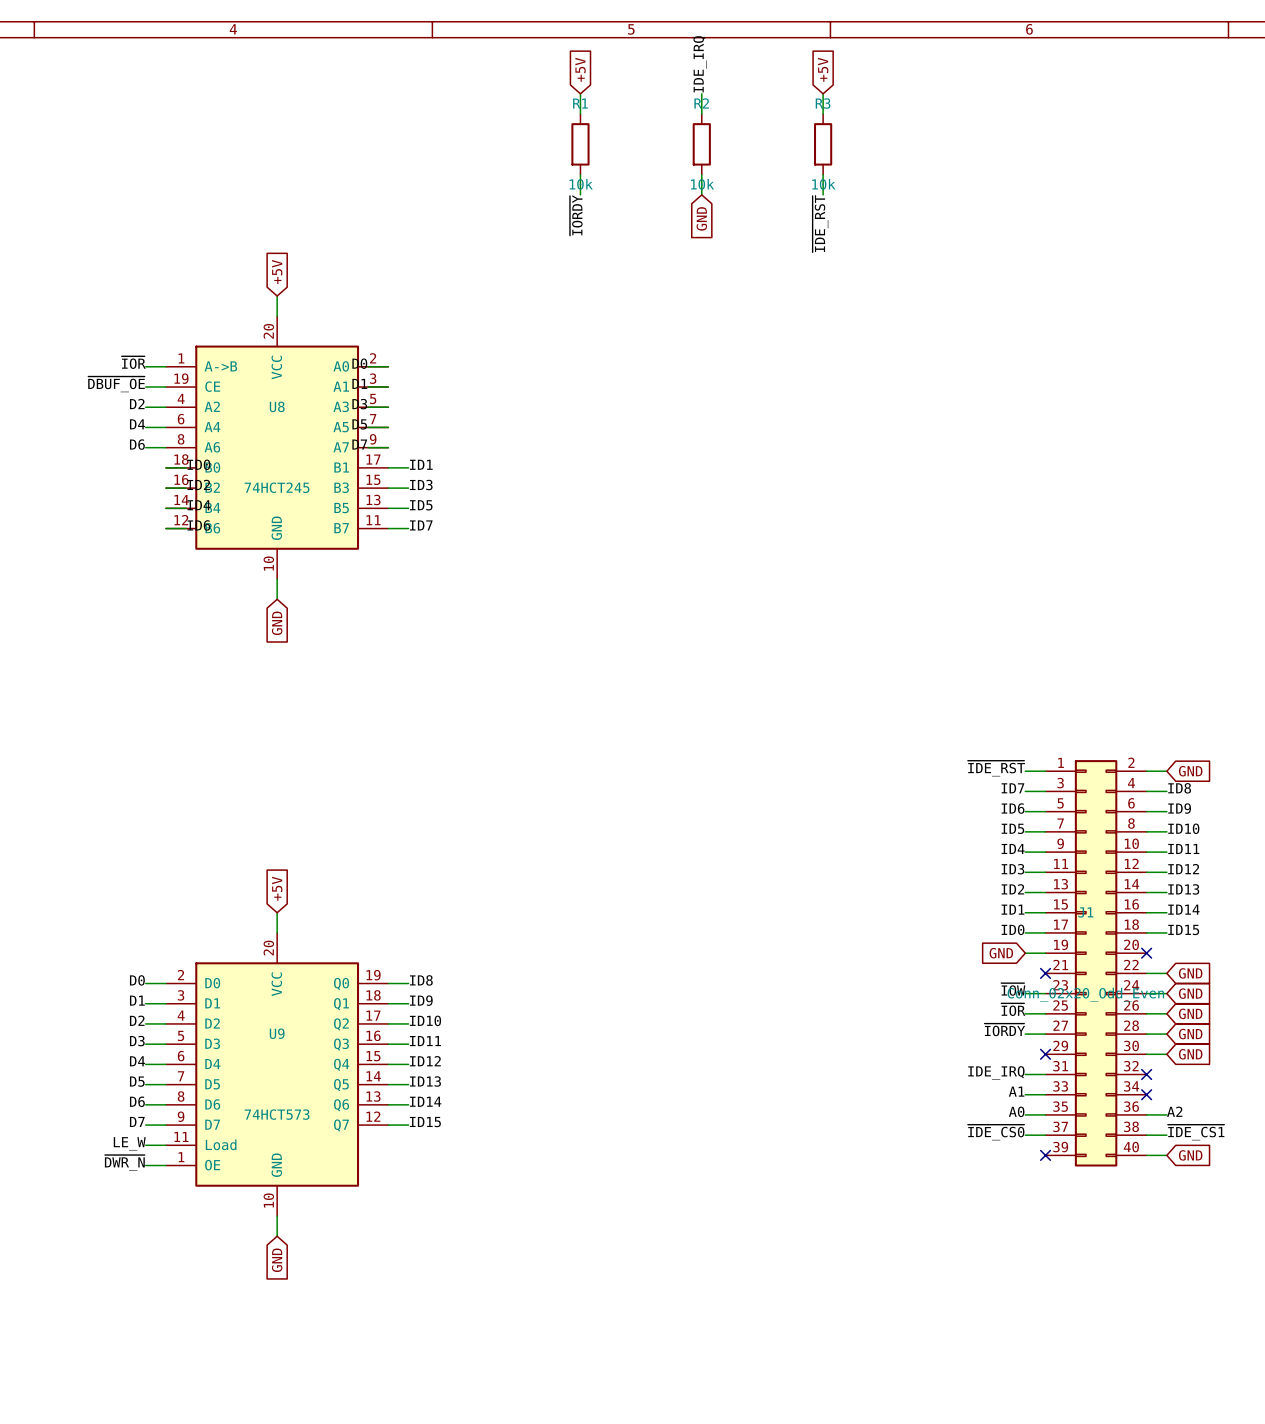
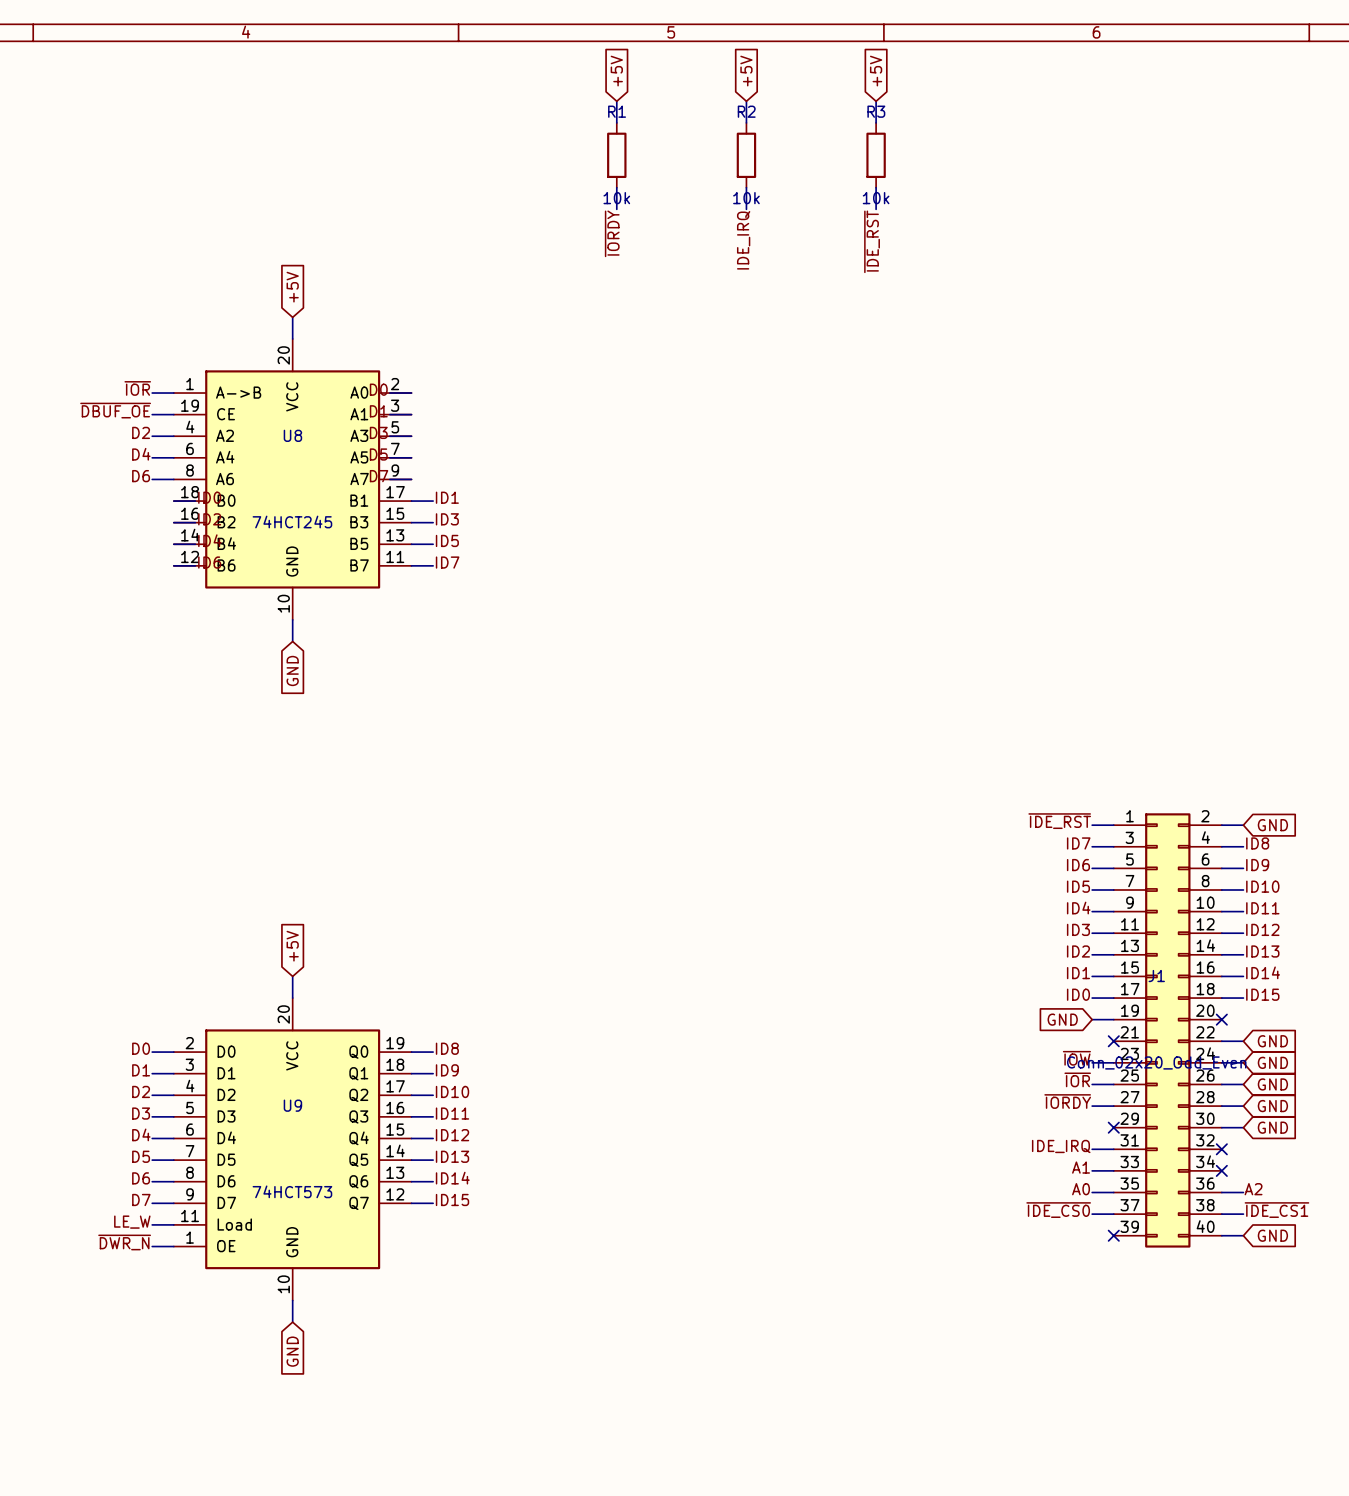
label position: IDE_IRQ (700, 64) -> IDE_IRQ (743, 240)
global label: none -> +5V (746, 71)
global label: GND (701, 218) -> none

